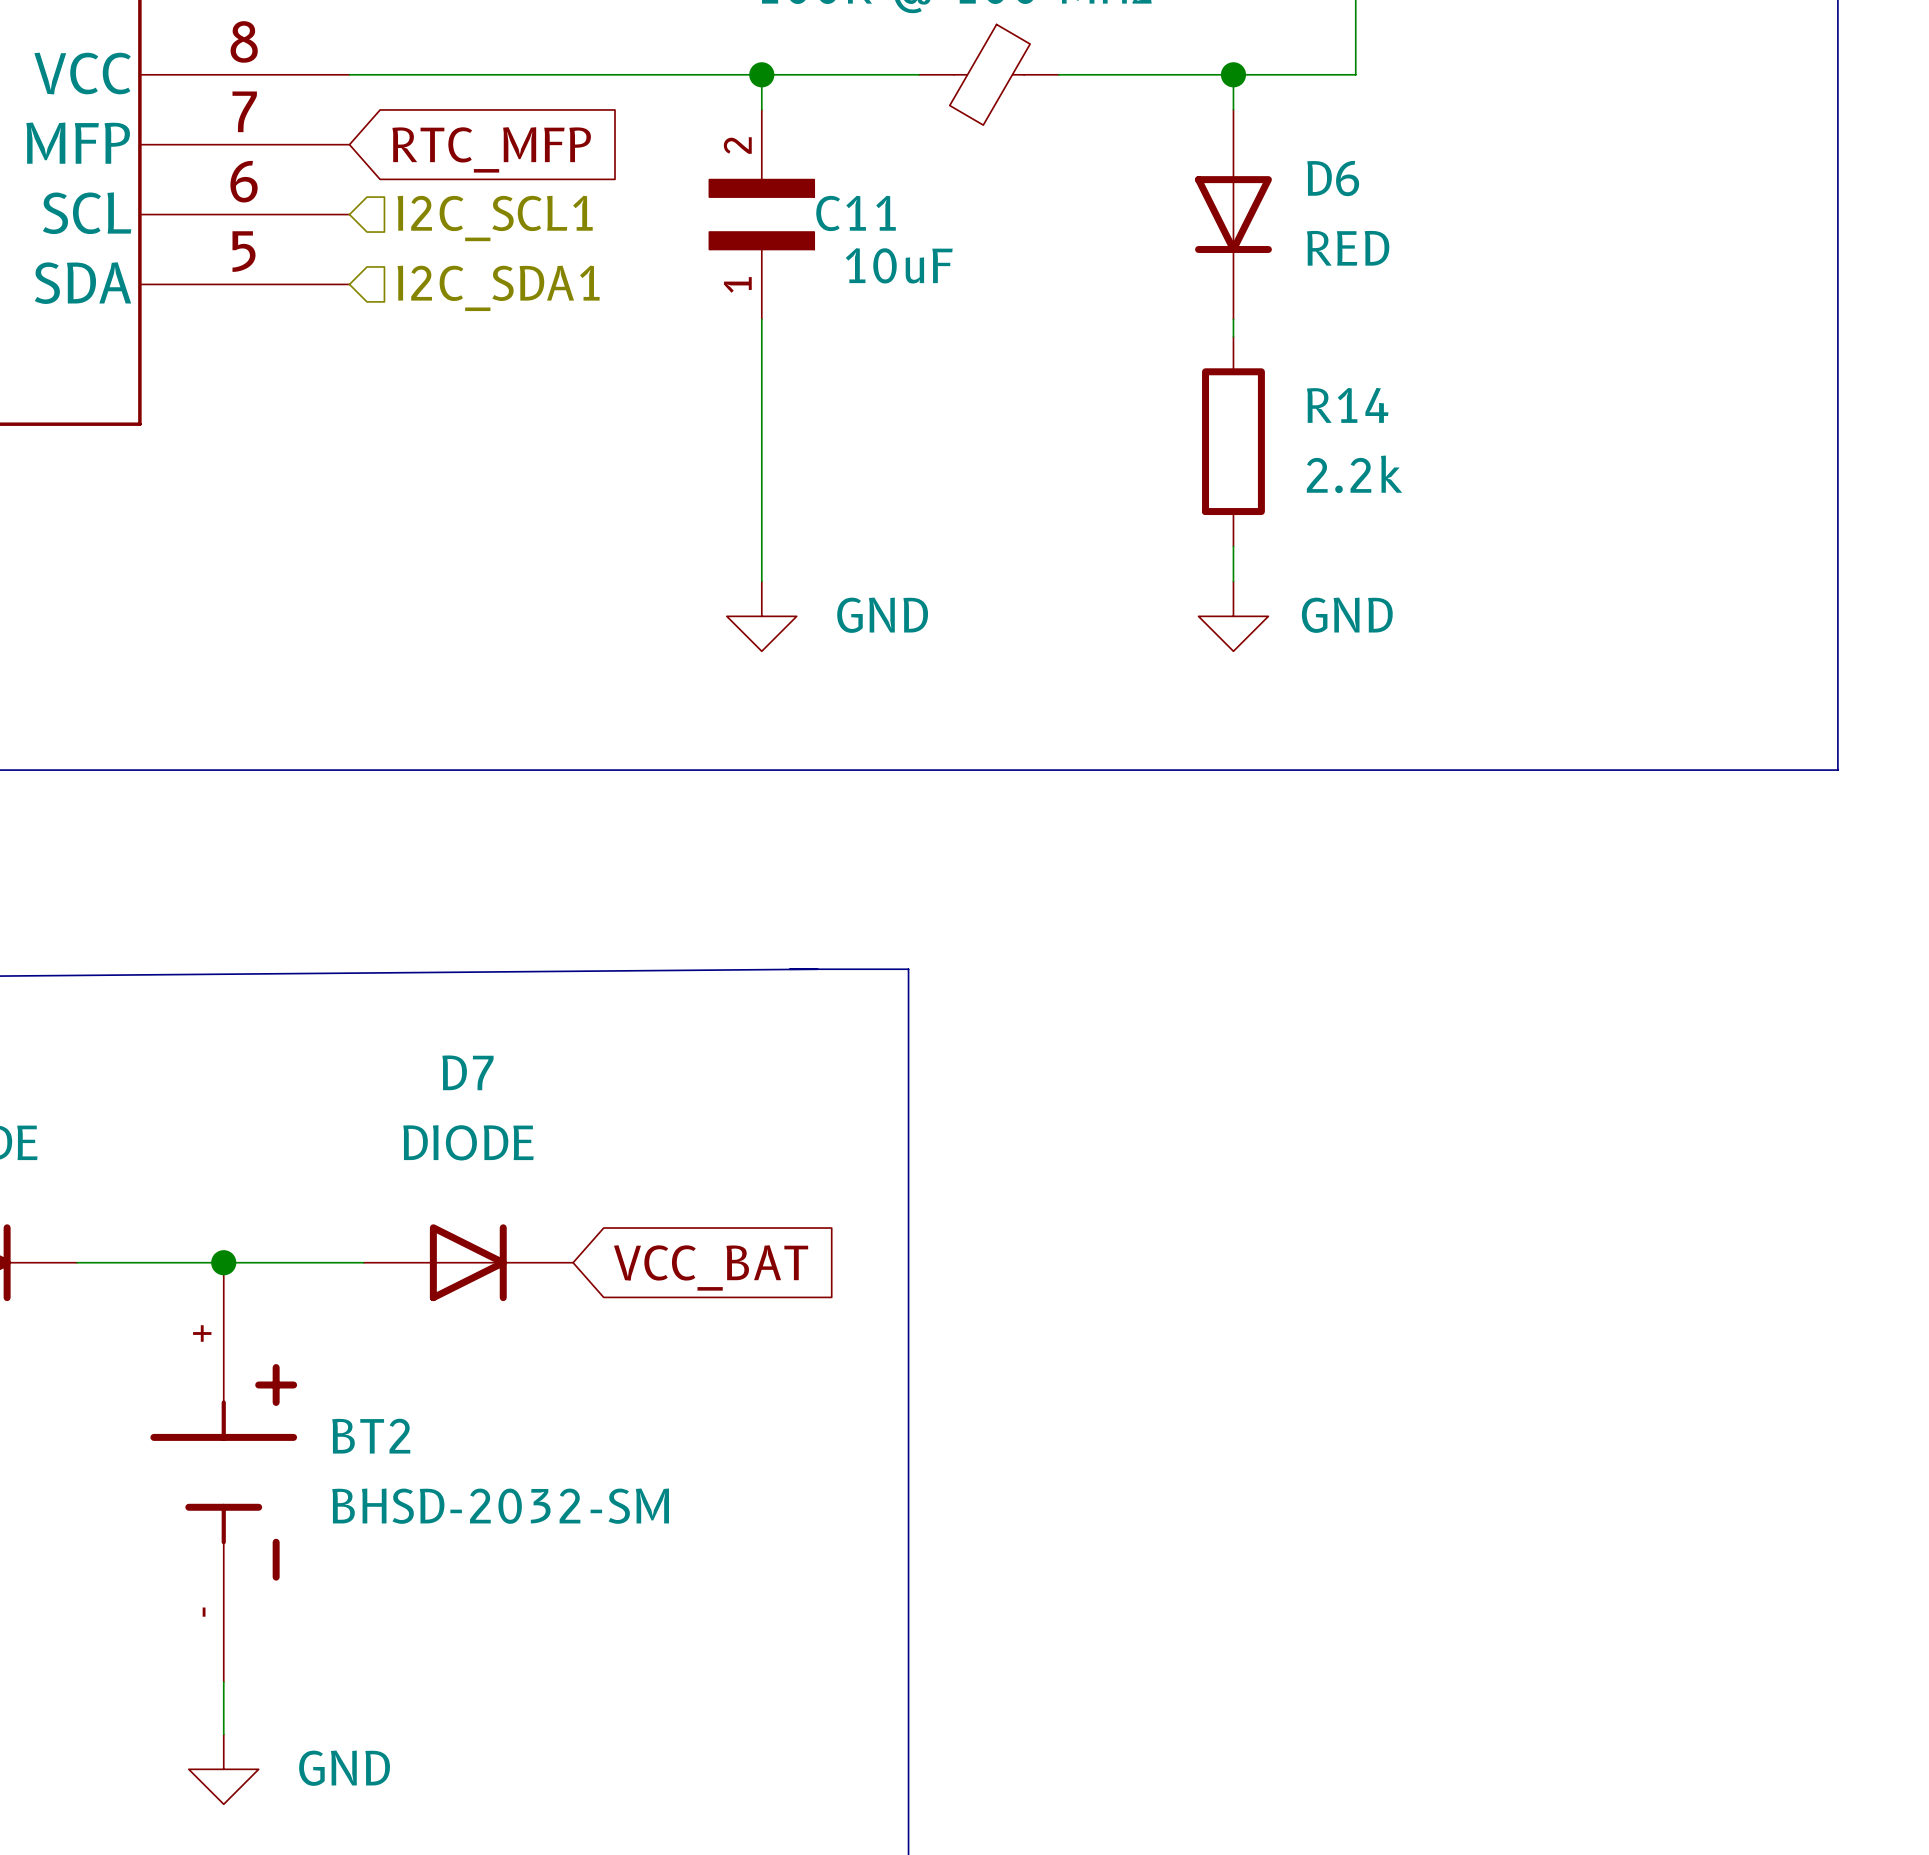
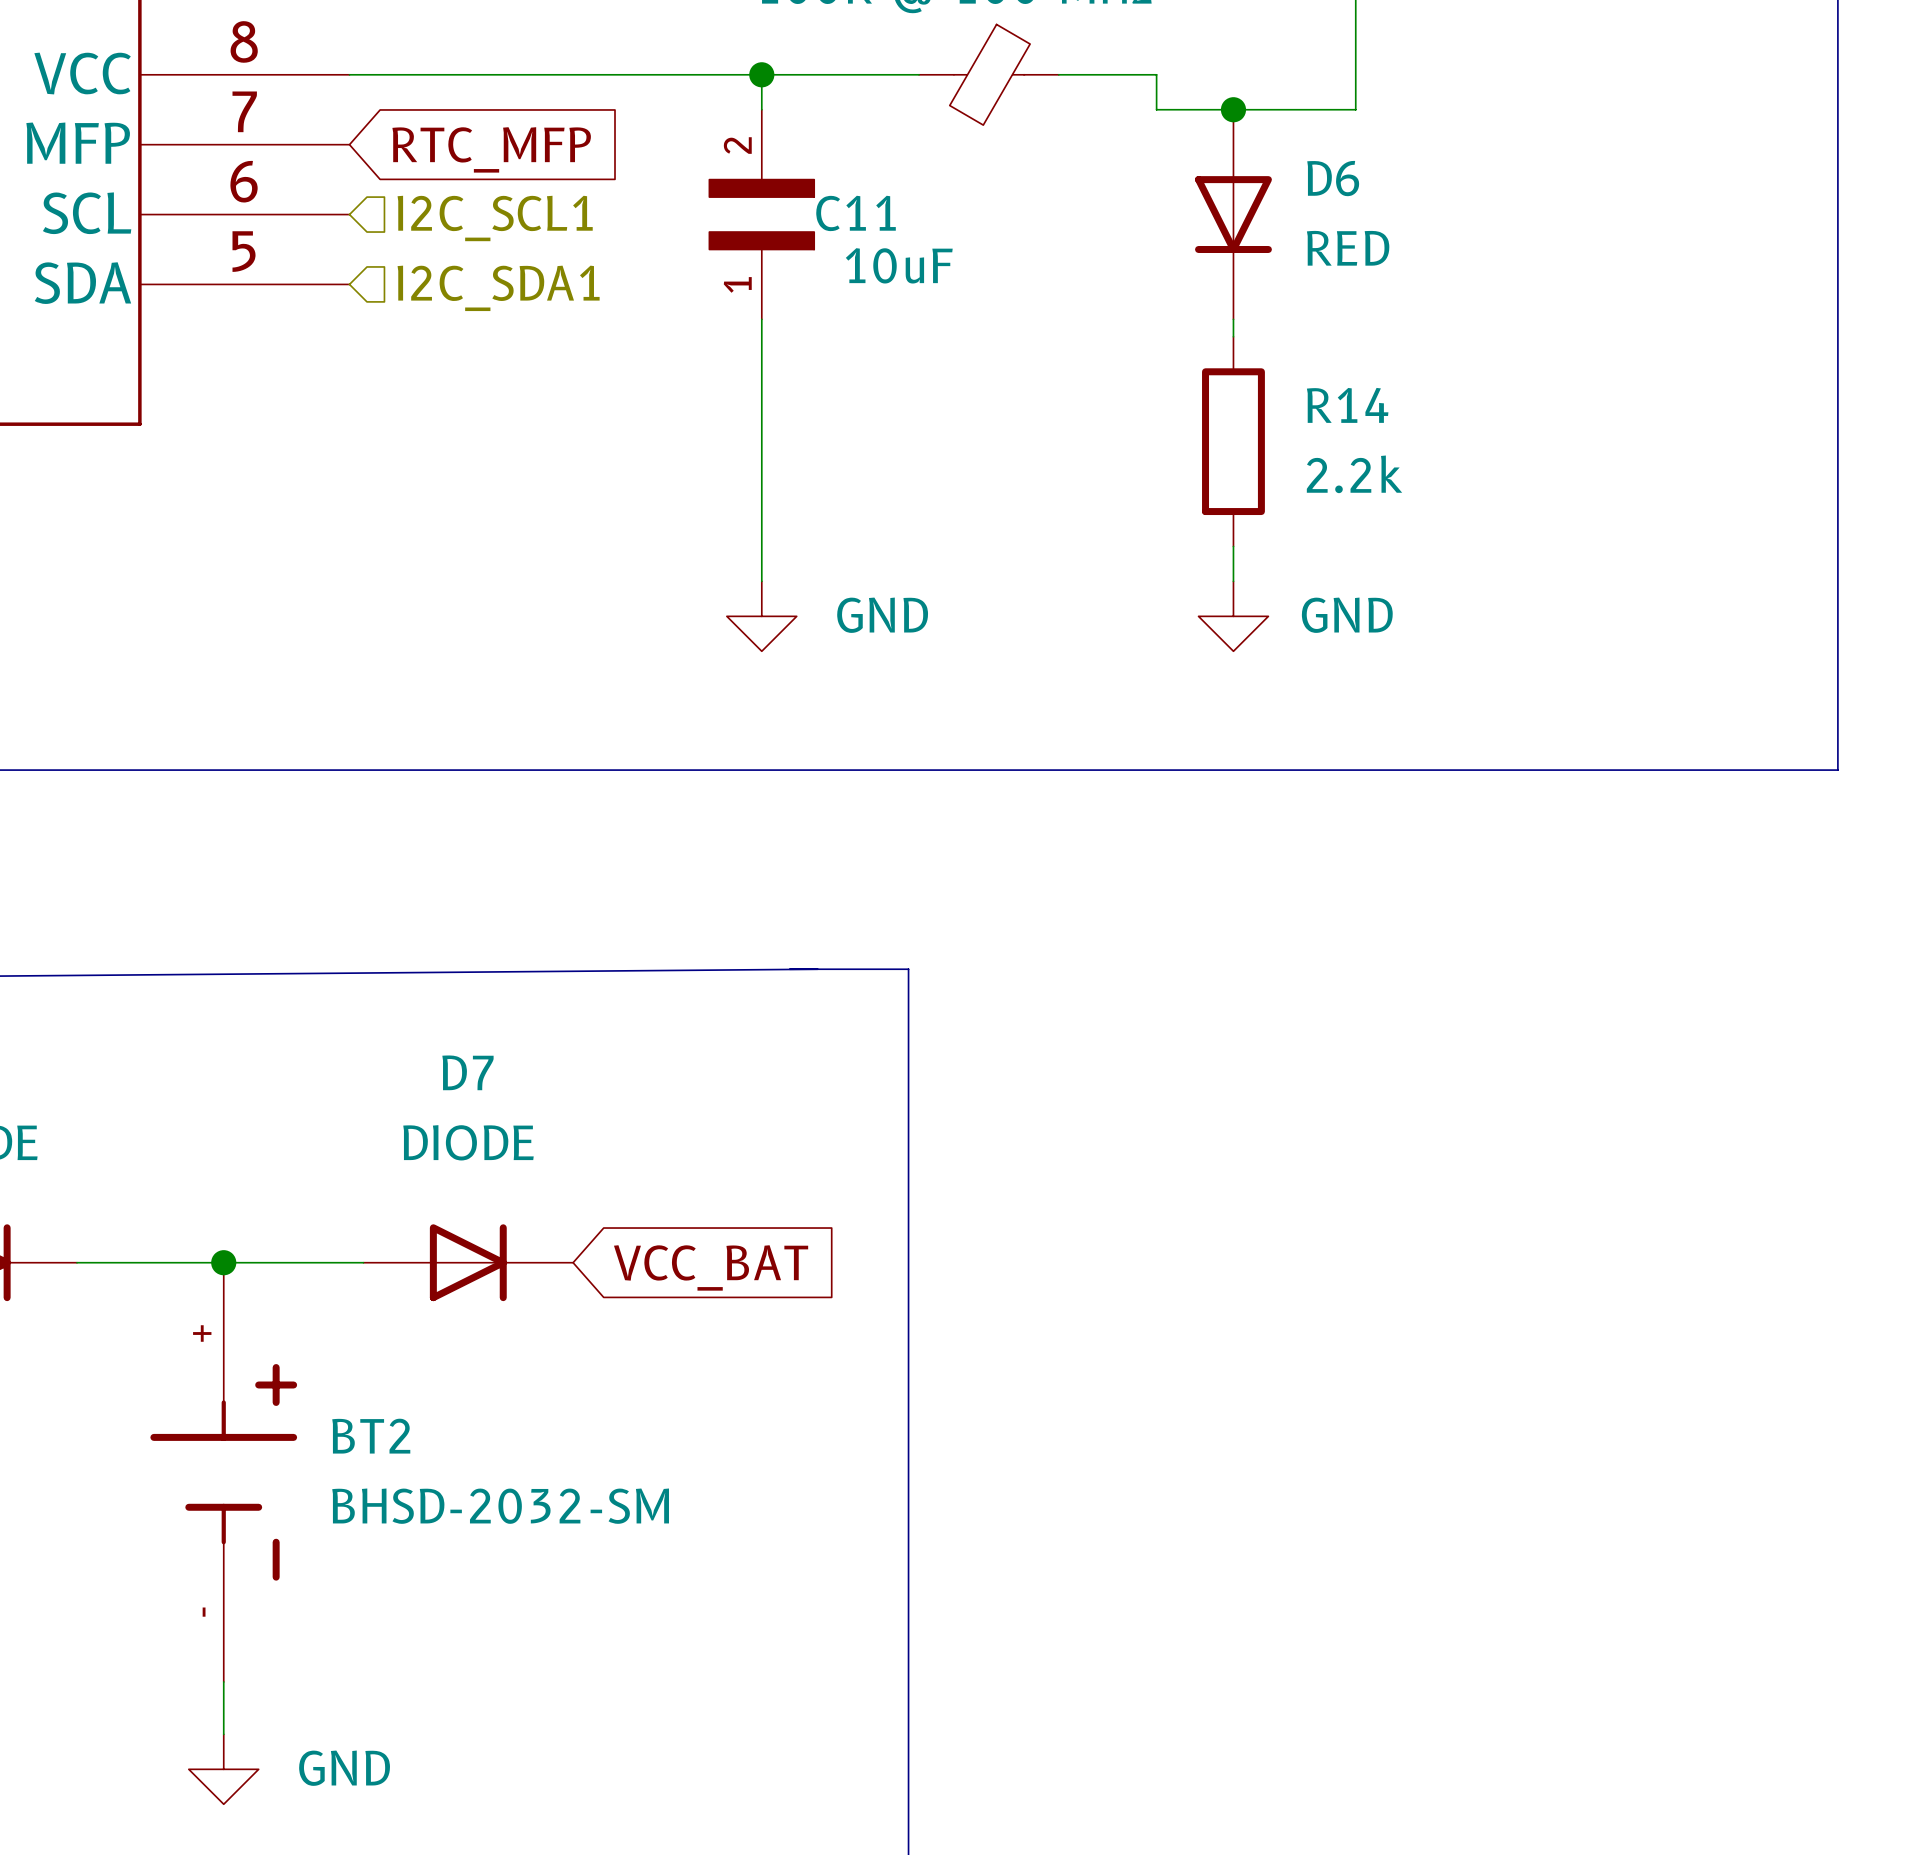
wire: (1156, 74) (1355, 74) -> (1156, 74) (1156, 109) (1355, 109) (1355, 74)
wire: (1233, 74) (1233, 109) -> none
junction position: (1233, 74) -> (1233, 109)

